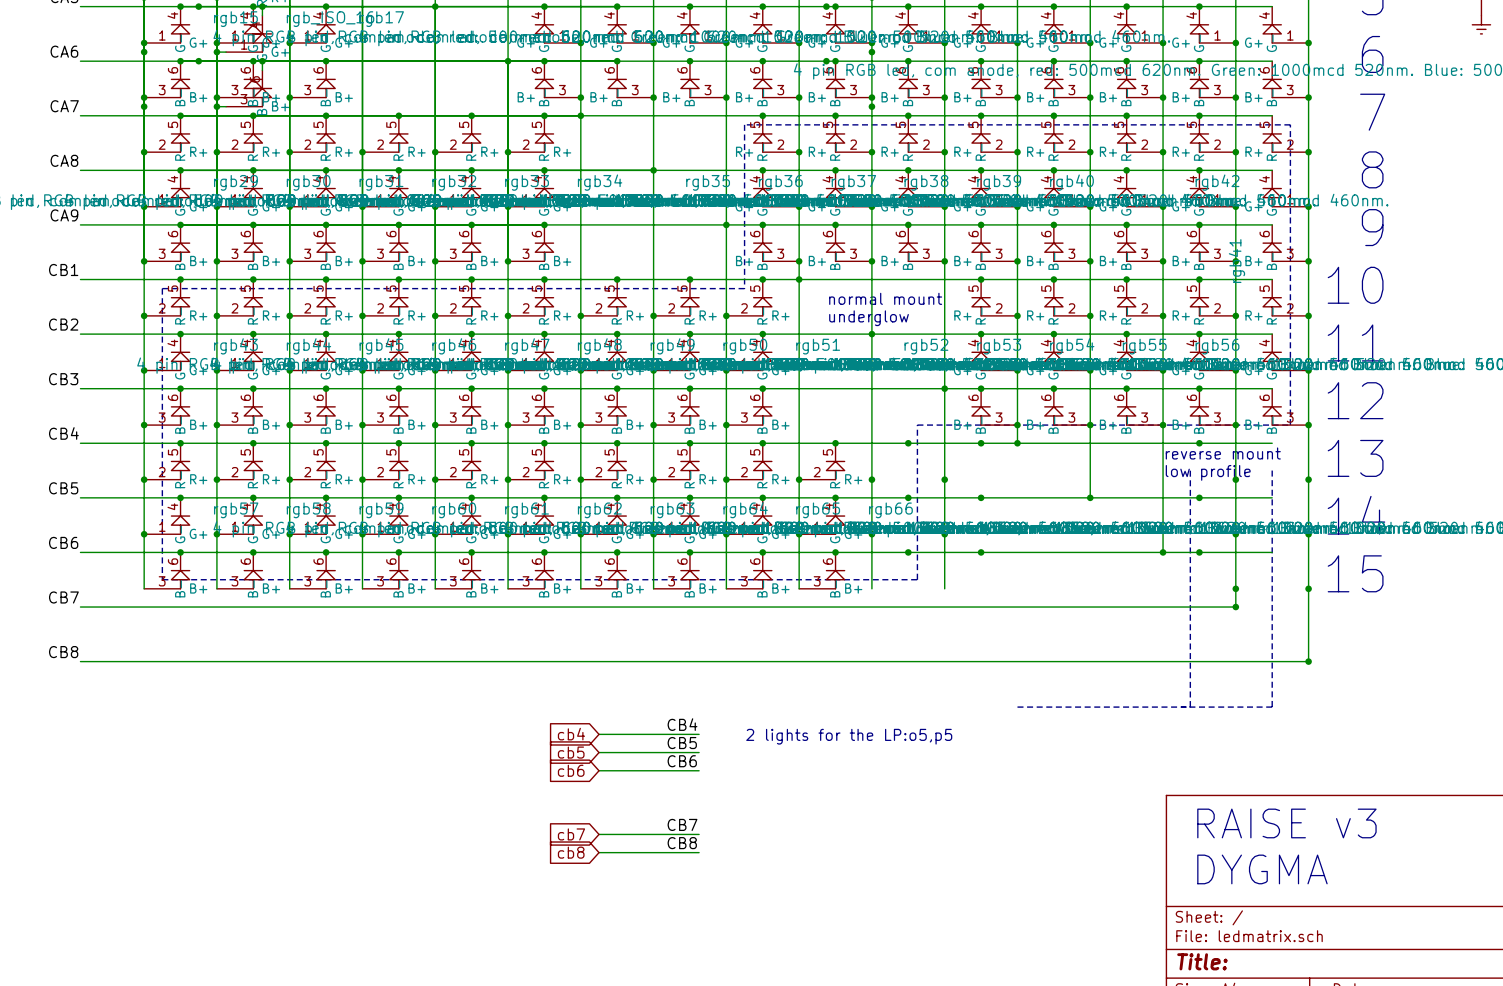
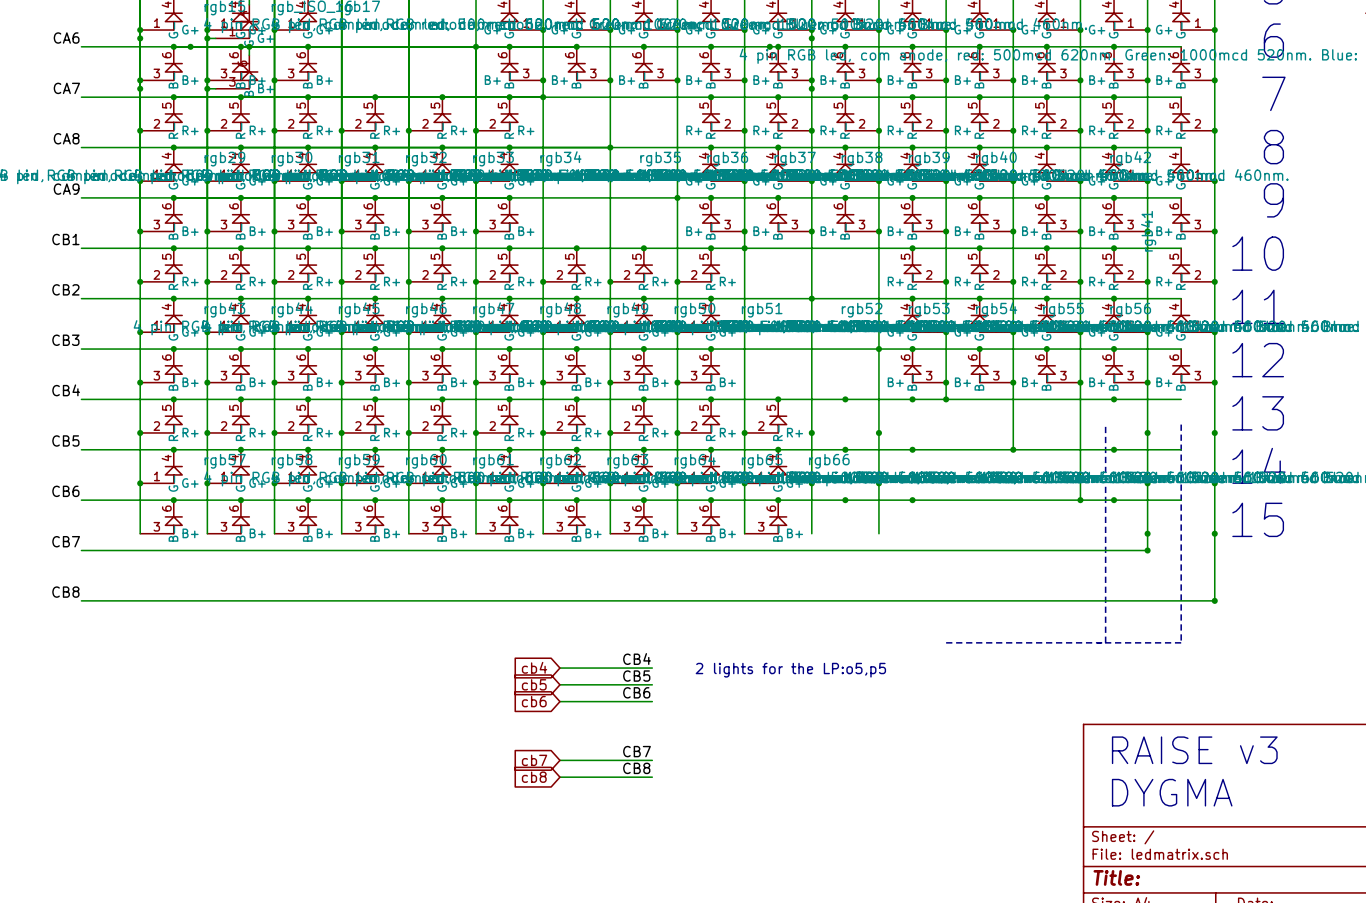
line: (744, 124) (744, 288) (162, 288) (162, 579) (917, 579) (917, 425) (1290, 425) (1290, 124) (744, 124) -> none
text: normal mount (885, 298) -> none
text: underglow (869, 318) -> none
text: reverse mount (1223, 453) -> none
text: low profile (1208, 472) -> none

